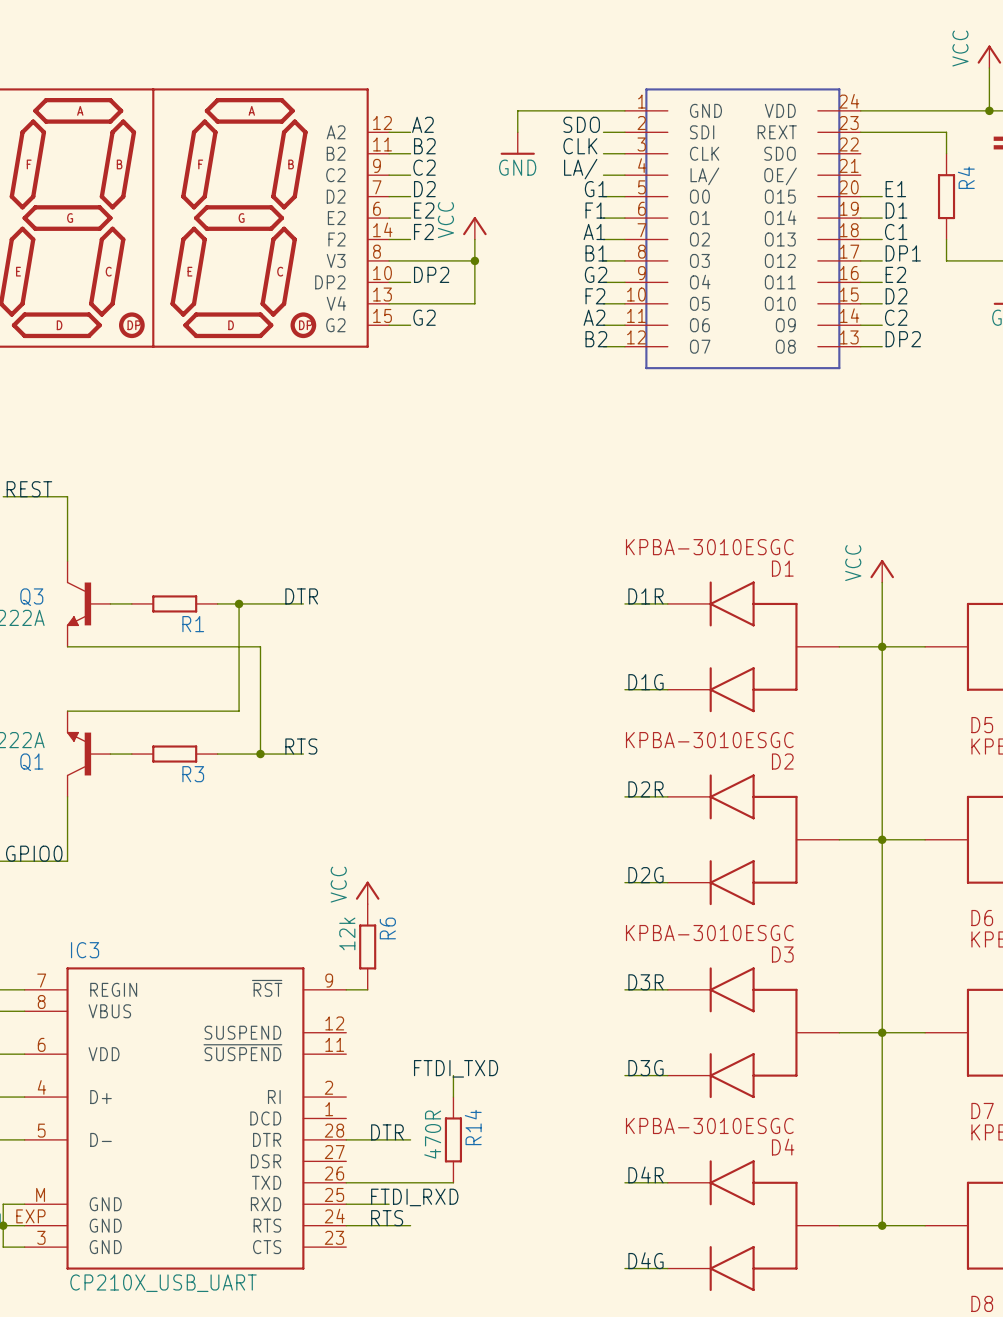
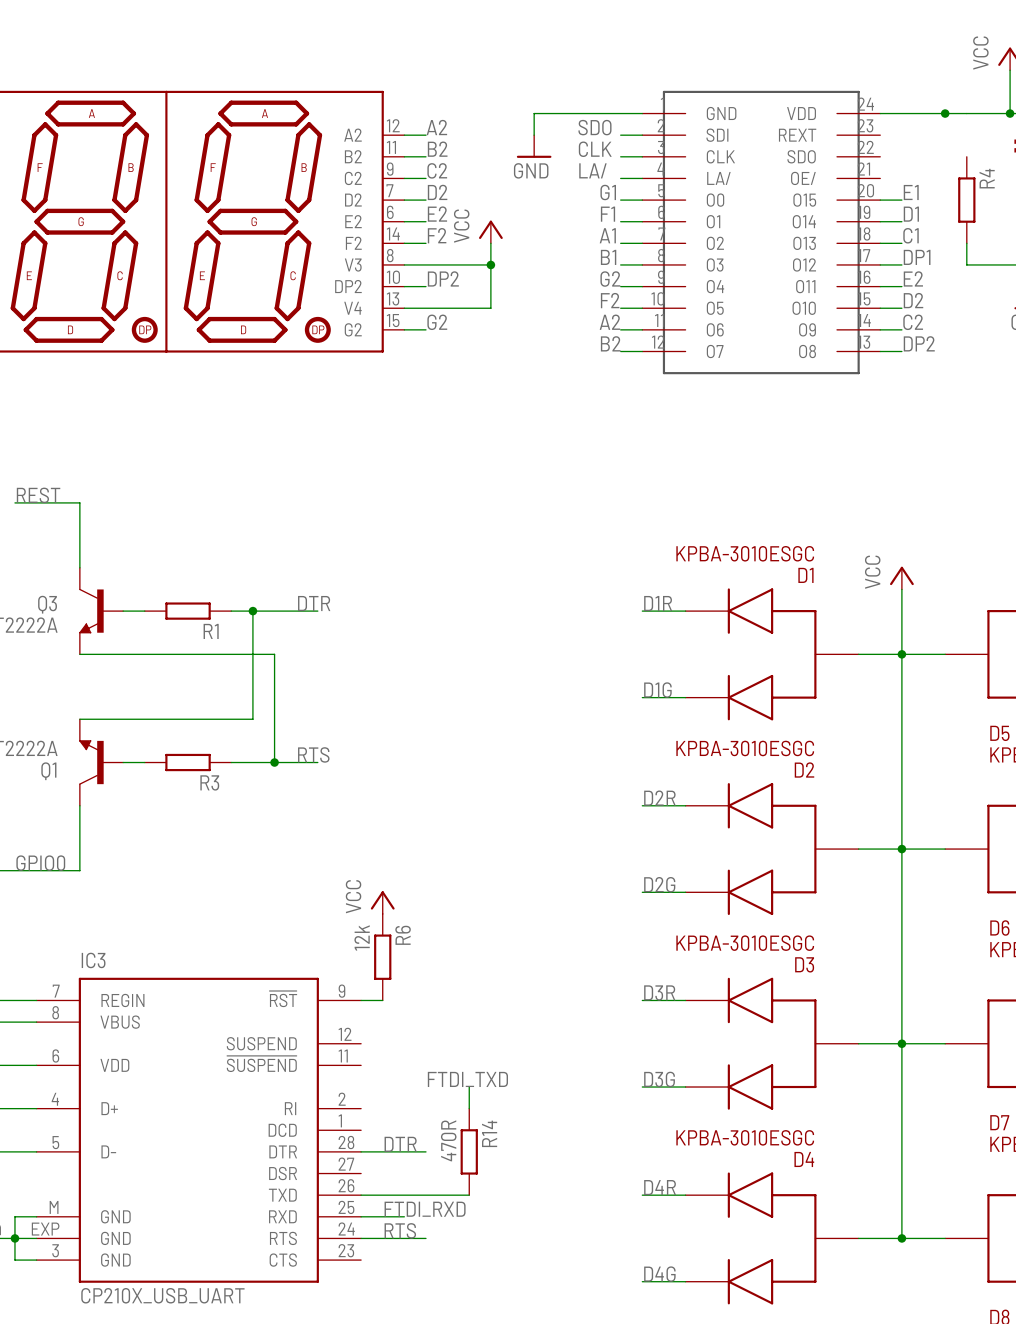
junction: none -> (945, 113)
wire: (860, 132) (946, 132) (946, 153) -> none

